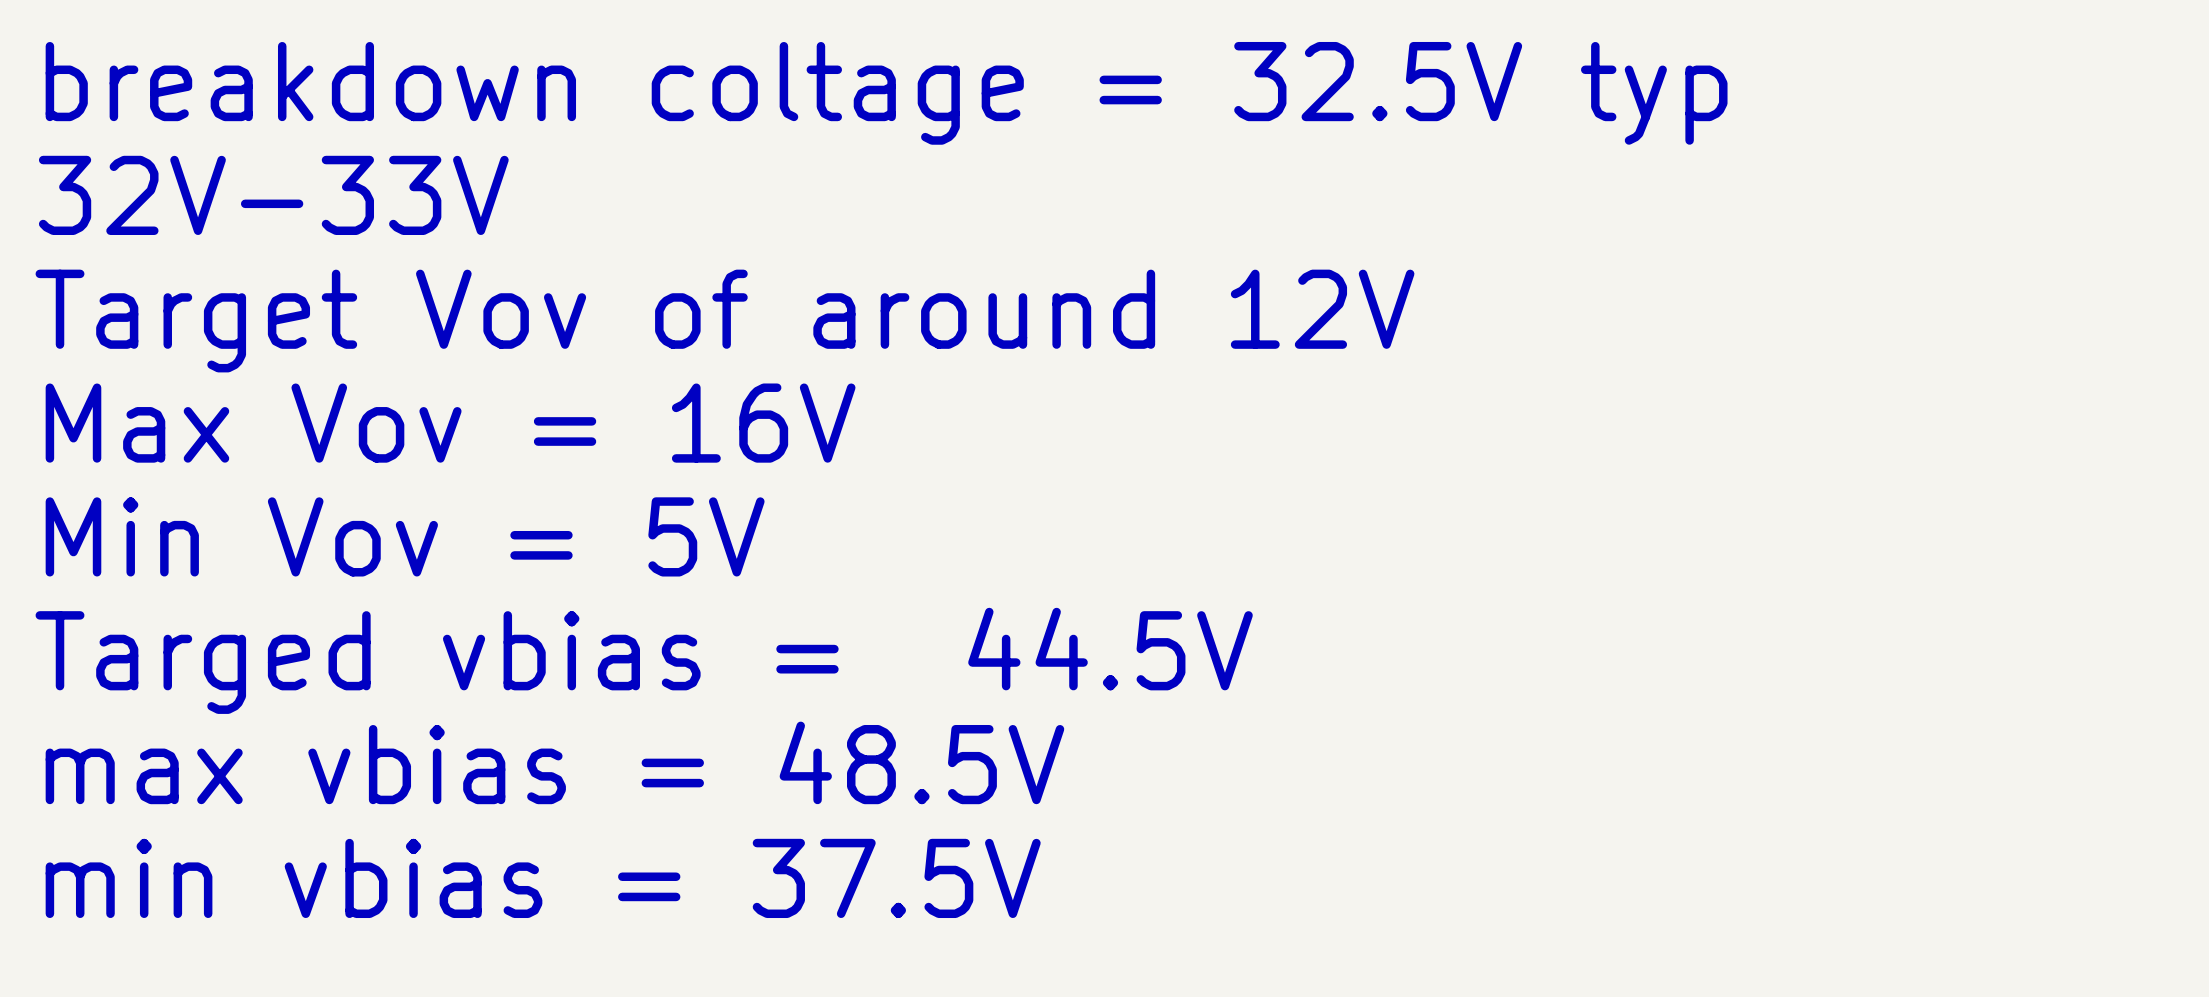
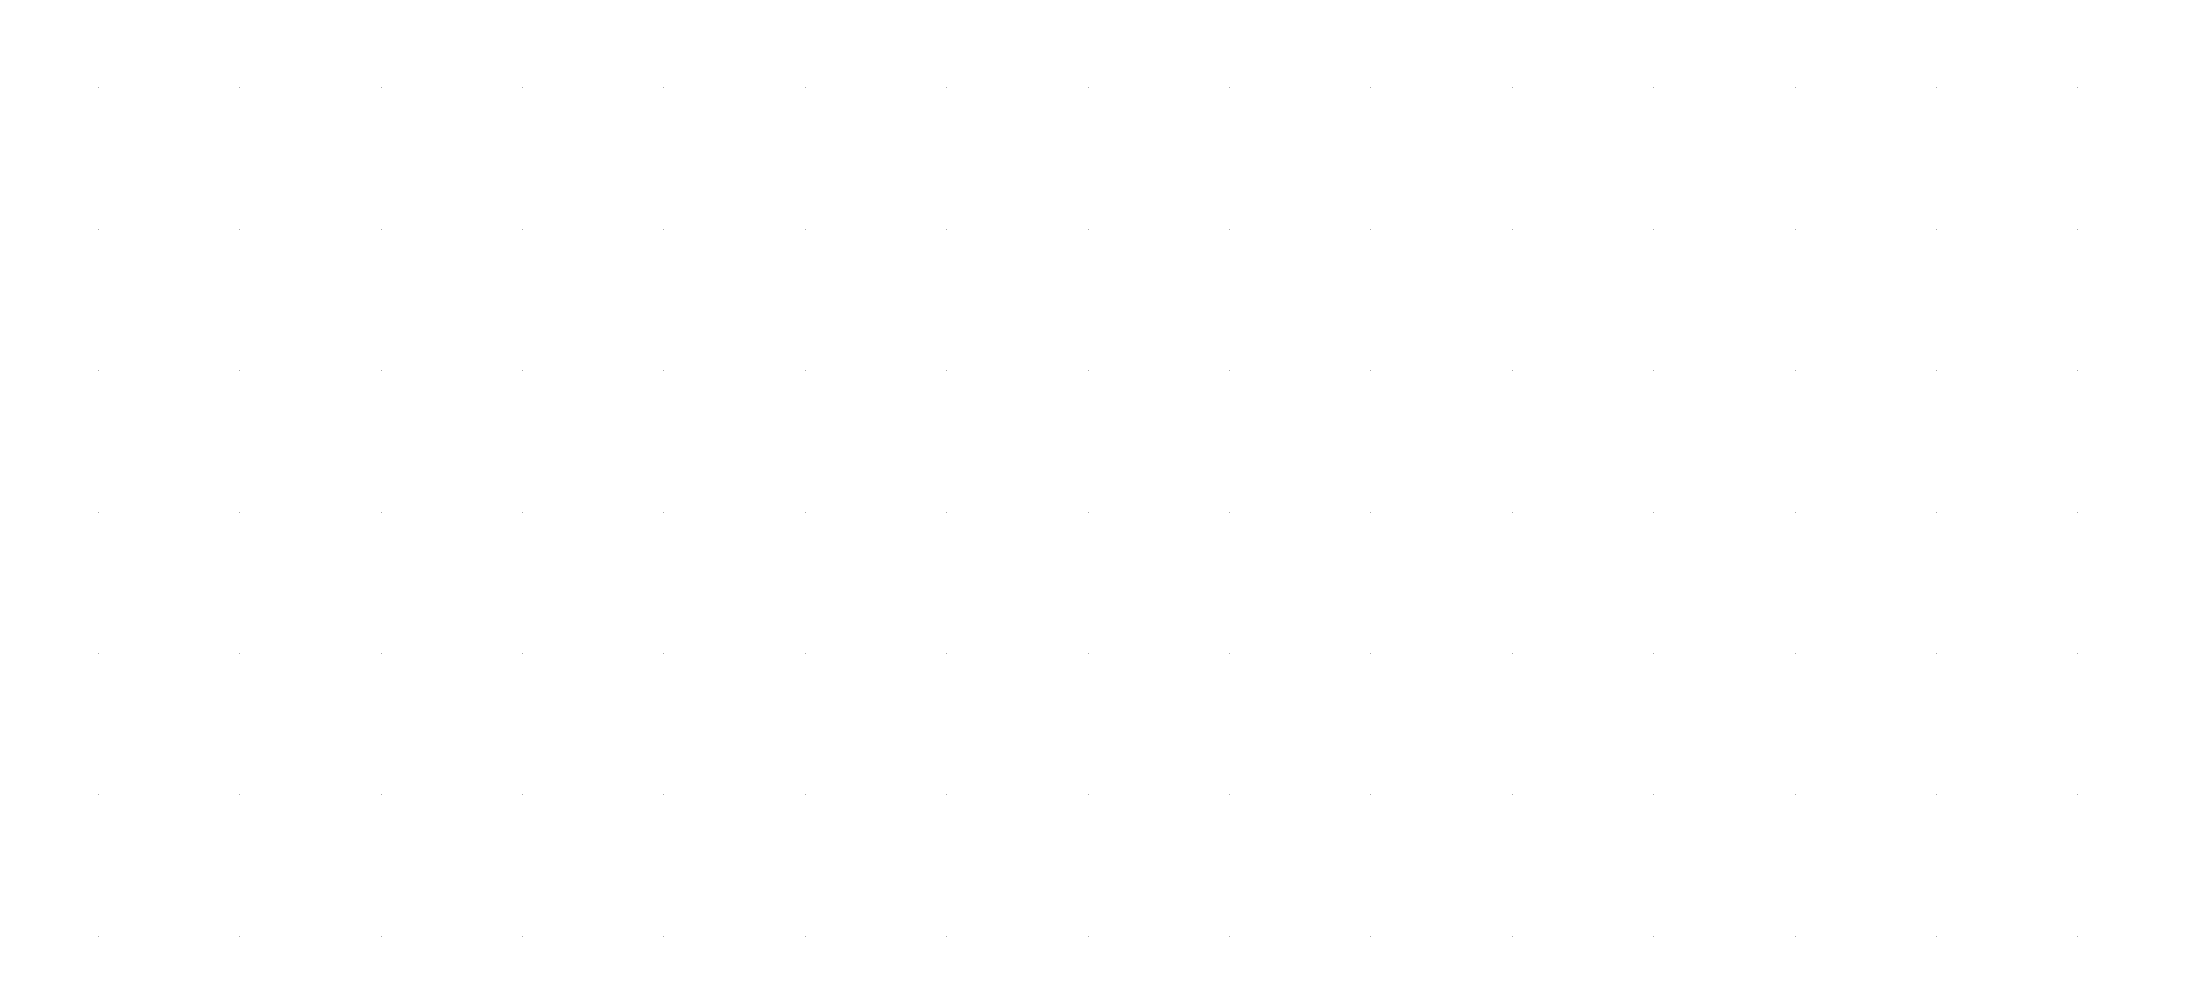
text: breakdown coltage = 32.5V typ (886, 93) -> none
text: 32V-33V (273, 195) -> none
text: Target Vov of around 12V (724, 321) -> none
text: Max Vov = 16V (450, 423) -> none
text: Min Vov = 5V (405, 536) -> none
text: Targed vbias = 44.5V (644, 660) -> none
text: max vbias = 48.5V (554, 762) -> none
text: min vbias = 37.5V (543, 878) -> none

